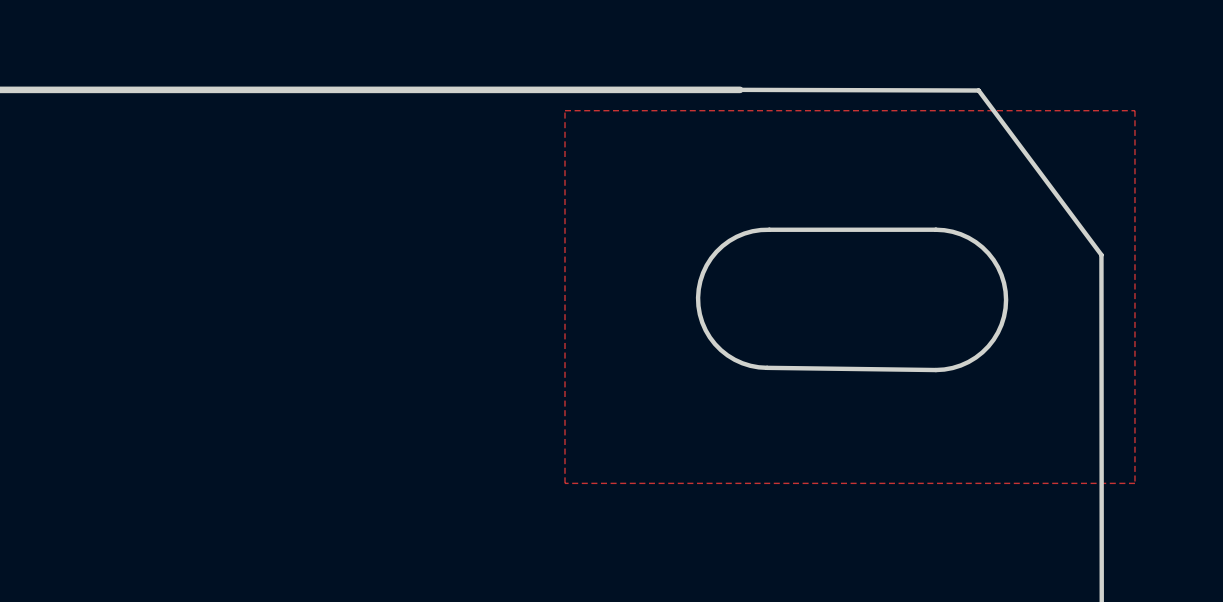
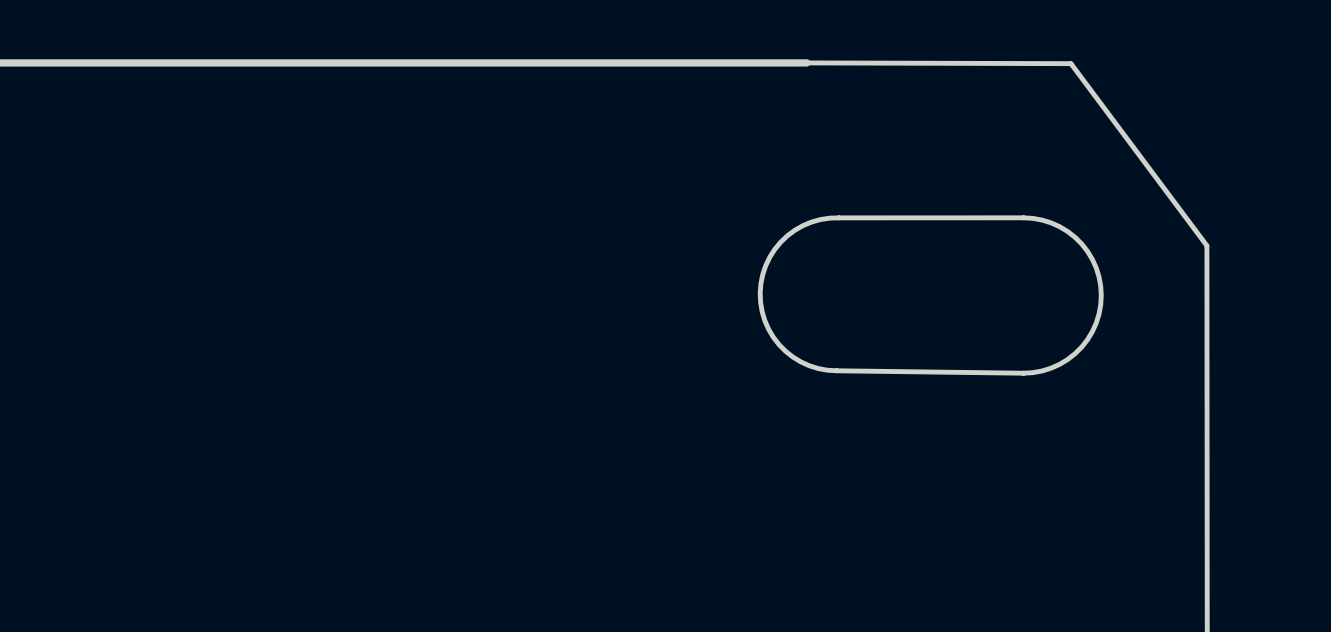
zone outline: (565, 110) (565, 483) (1134, 483) (1134, 110) (565, 110) -> none

